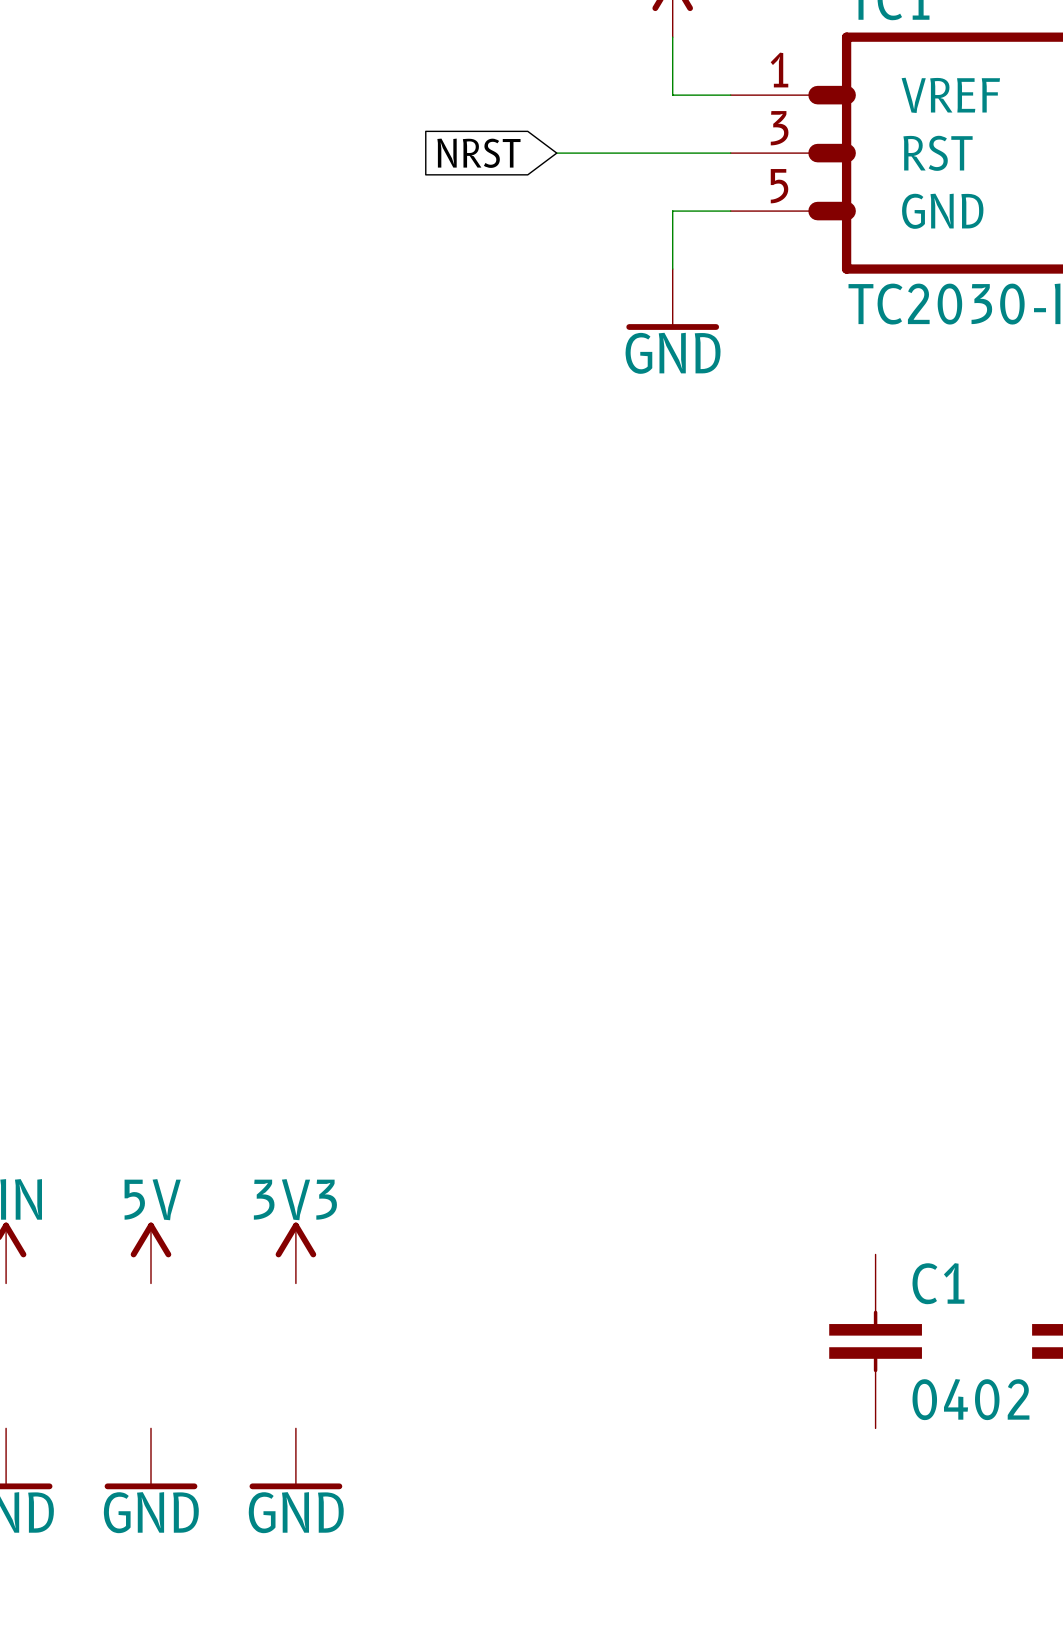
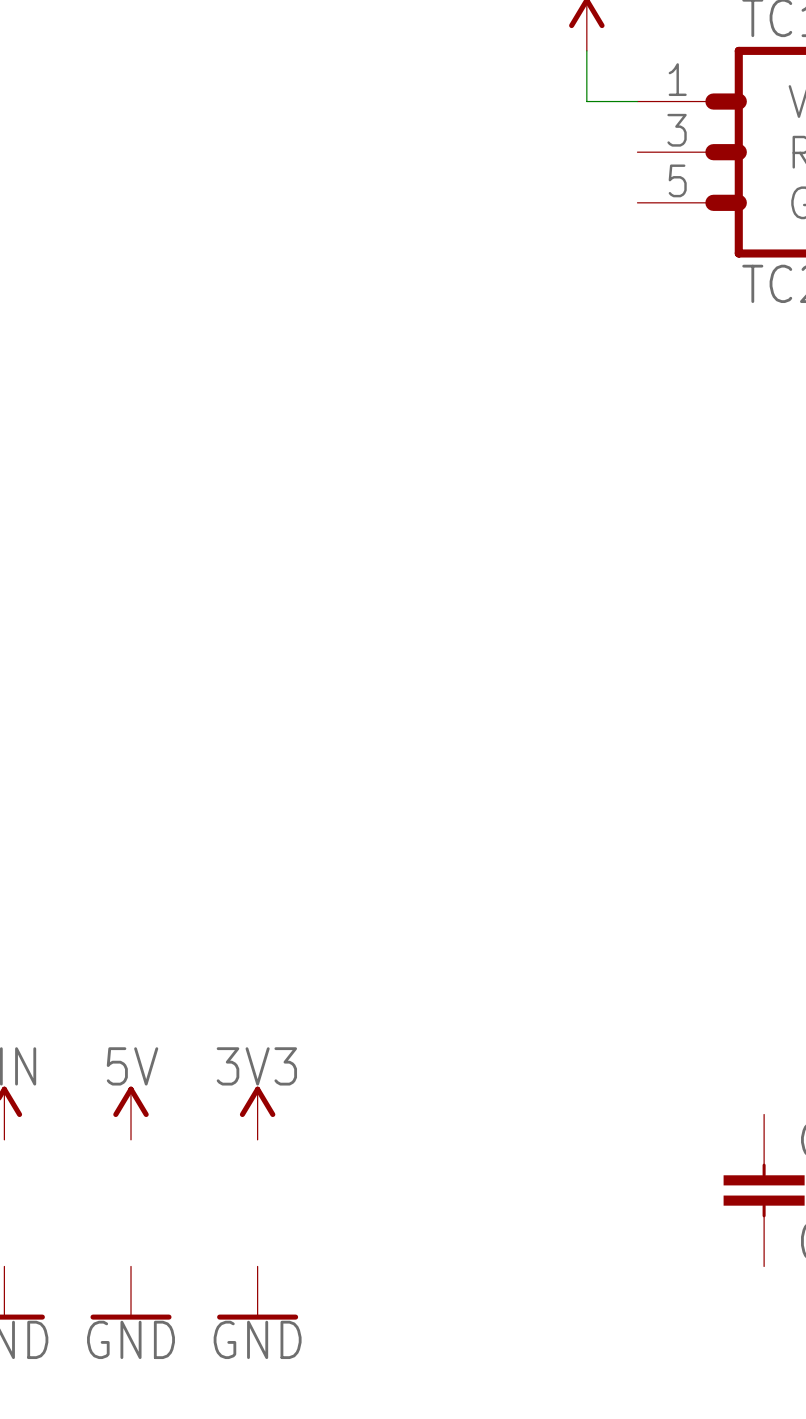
global label: NRST (478, 153) -> none
wire: (556, 153) (730, 153) -> none
wire: (730, 211) (672, 211) (672, 269) -> none
power symbol: GND (672, 299) -> none

